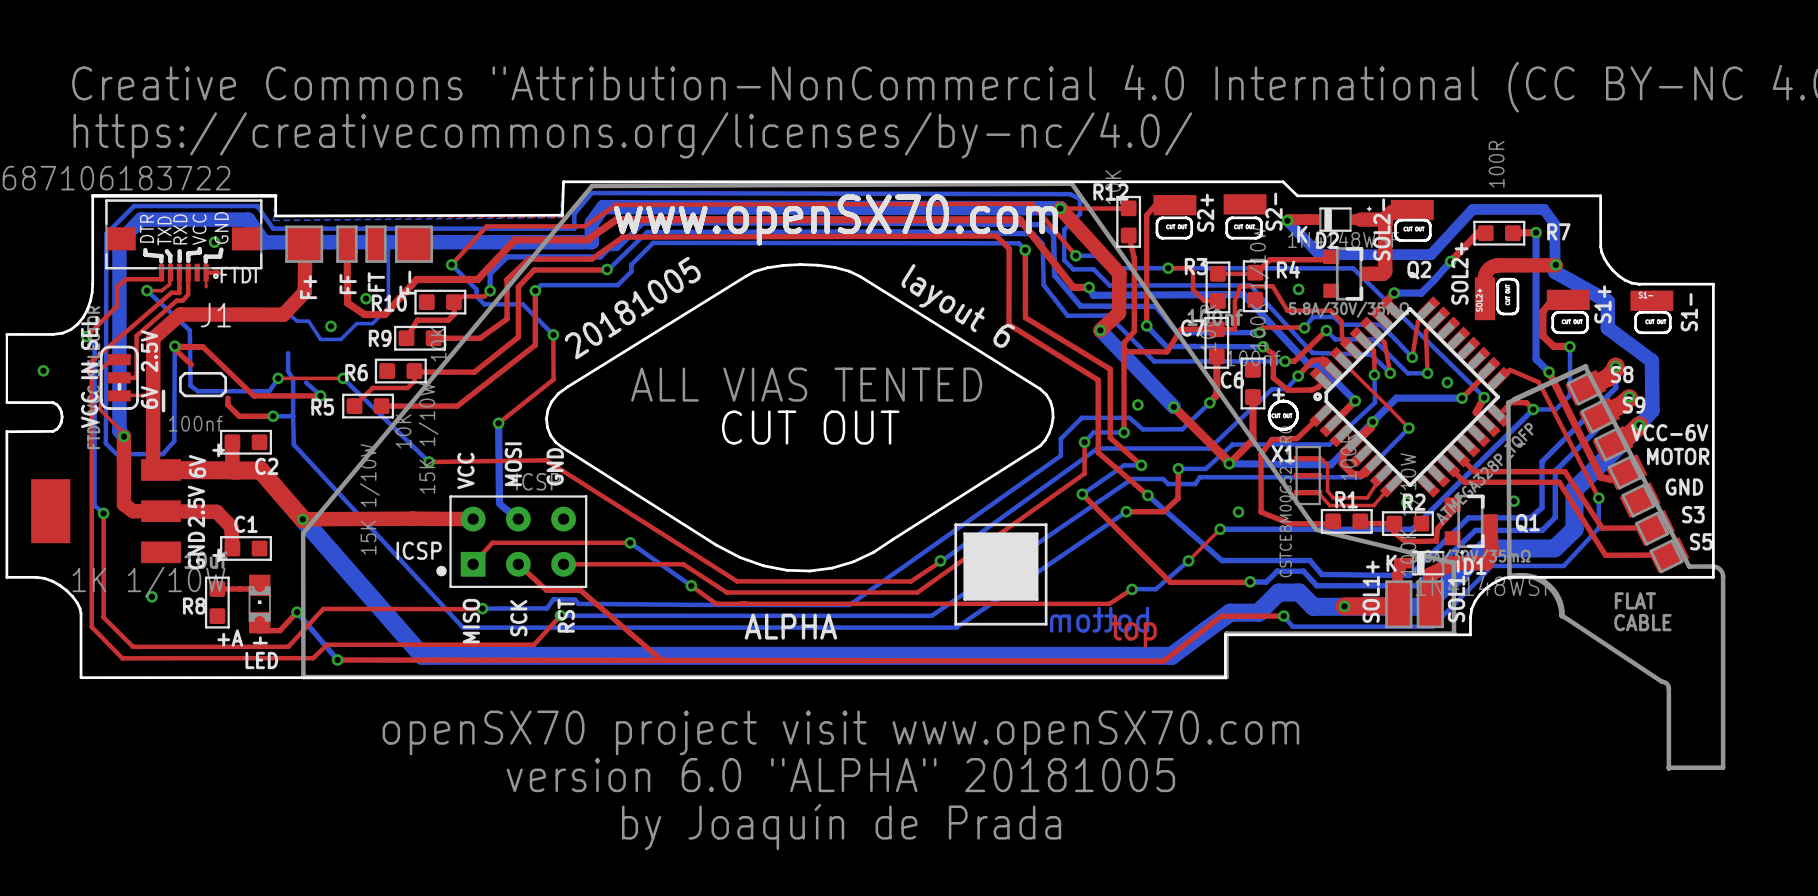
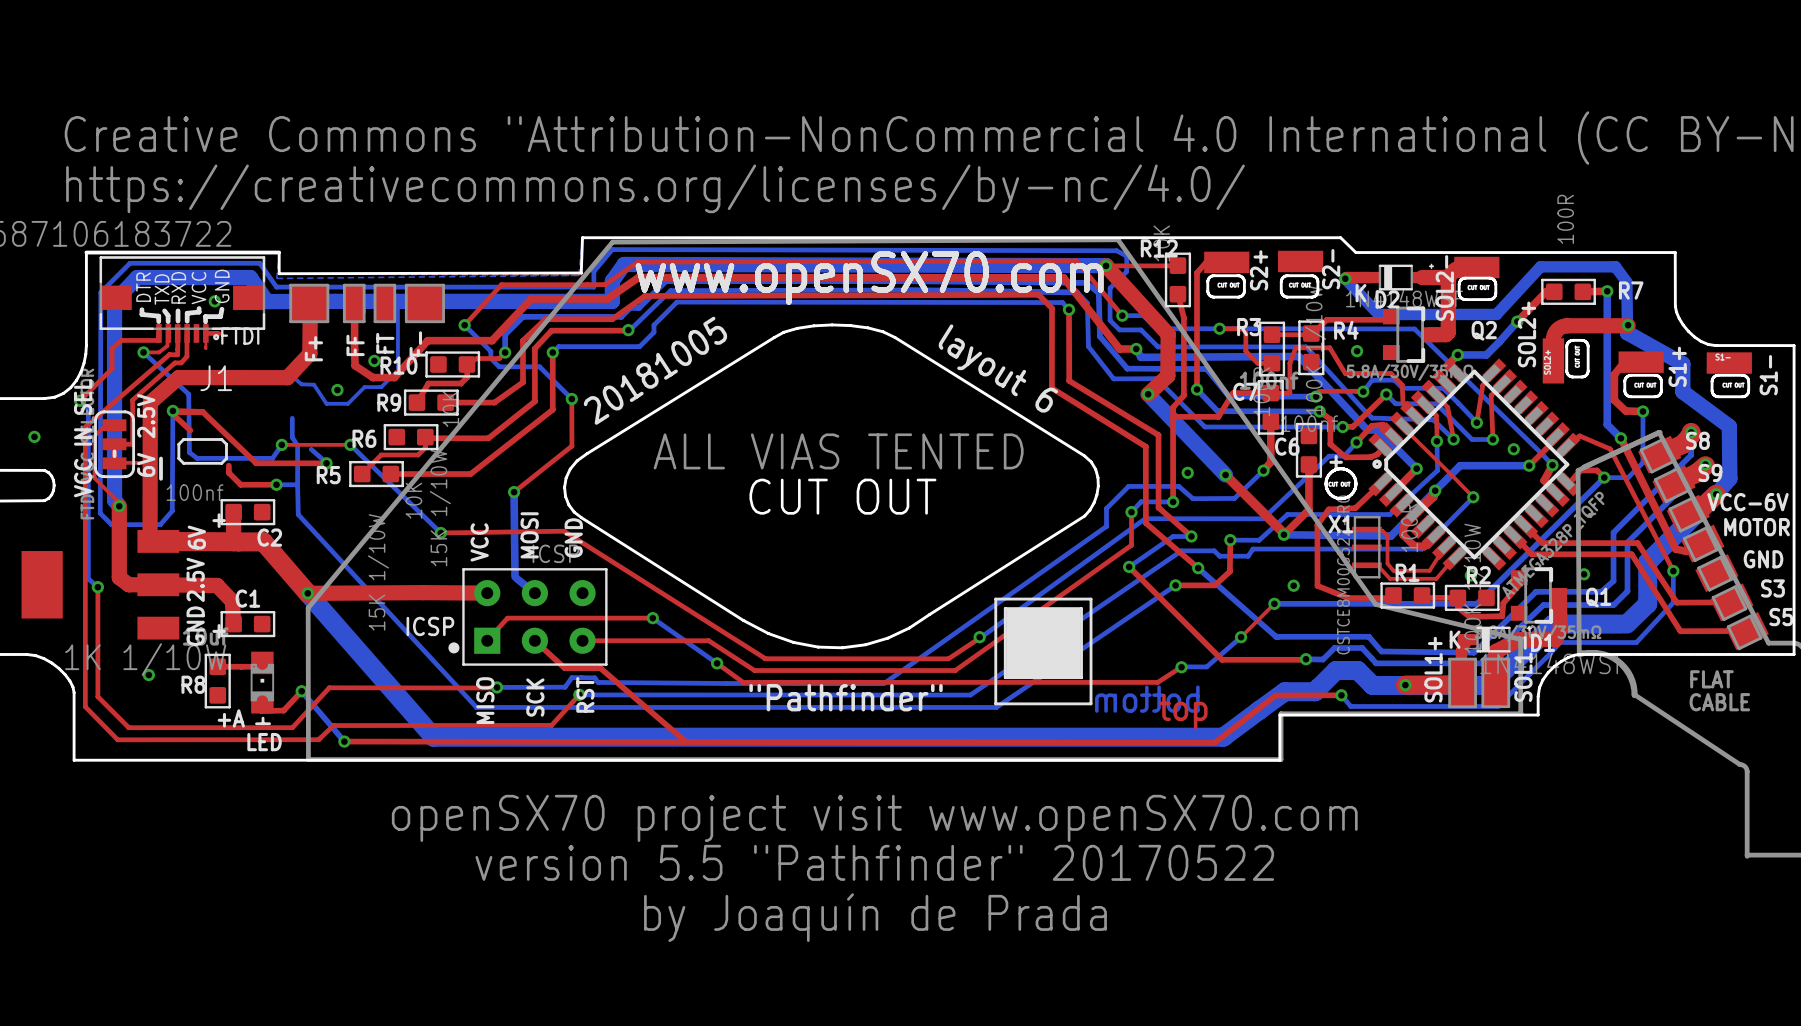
text: none -> "Pathfinder" (846, 697)
text: ALPHA (790, 626) -> none
text: version 6.0 "ALPHA" 20181005 (840, 775) -> version 5.5 "Pathfinder" 20170522 (874, 862)

